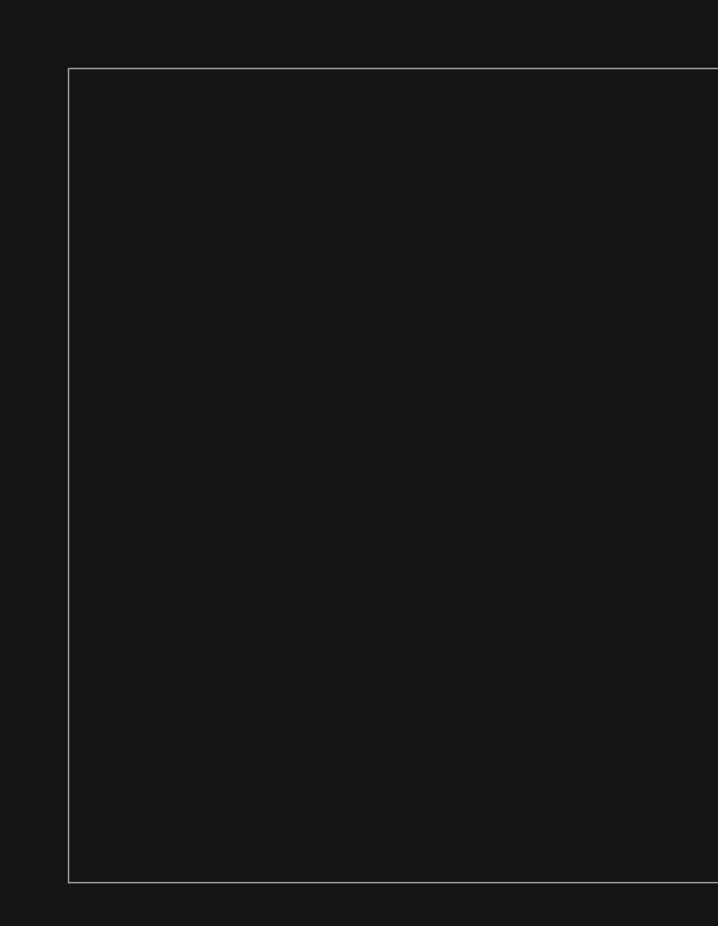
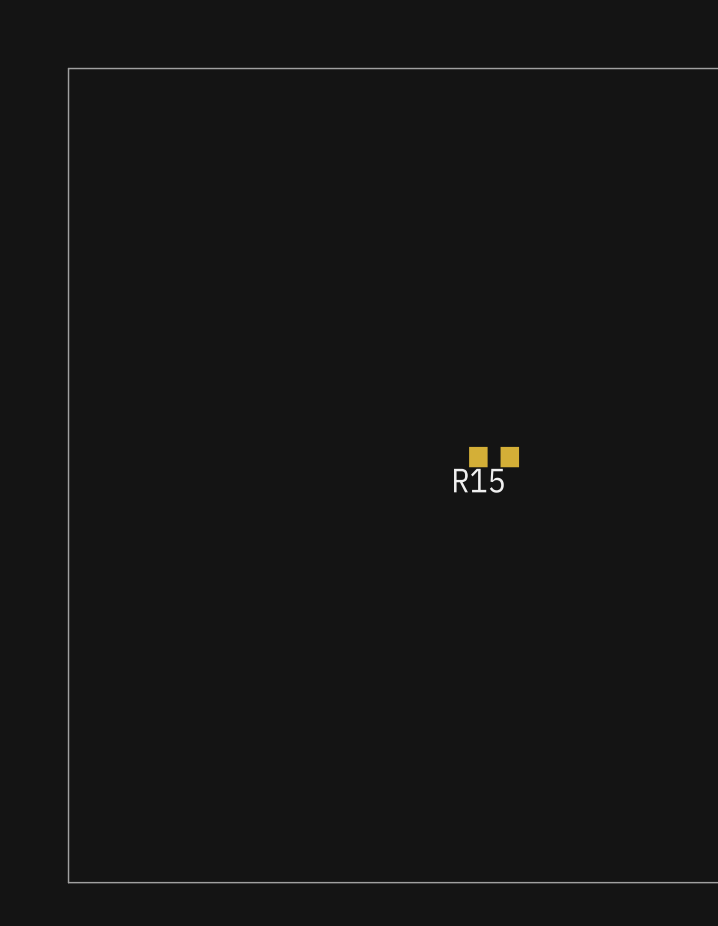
R15: none -> (494, 457)

